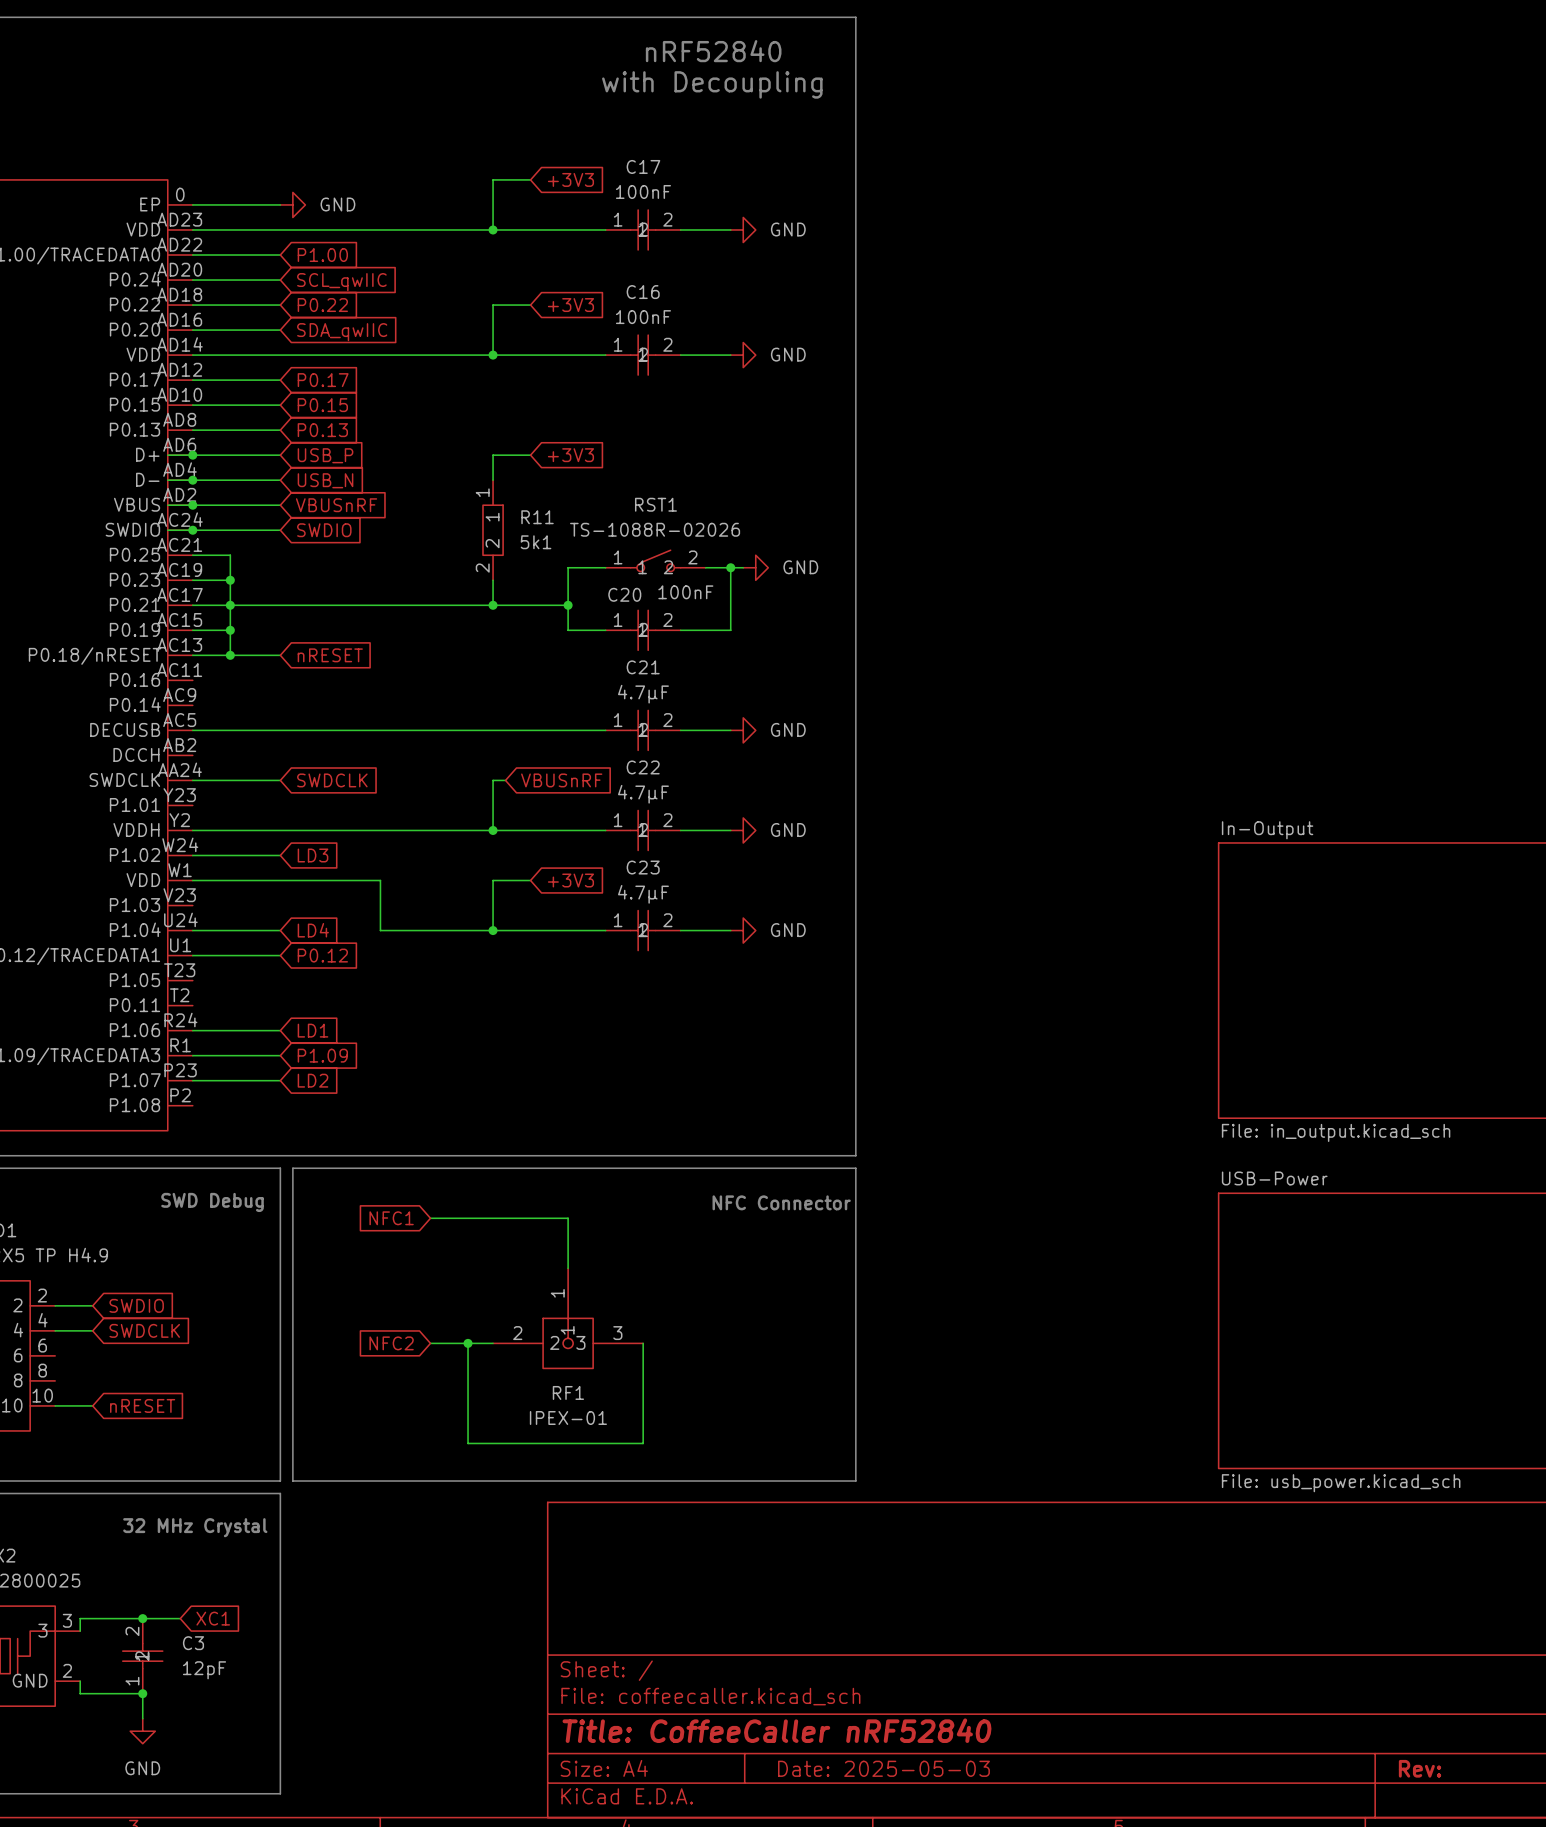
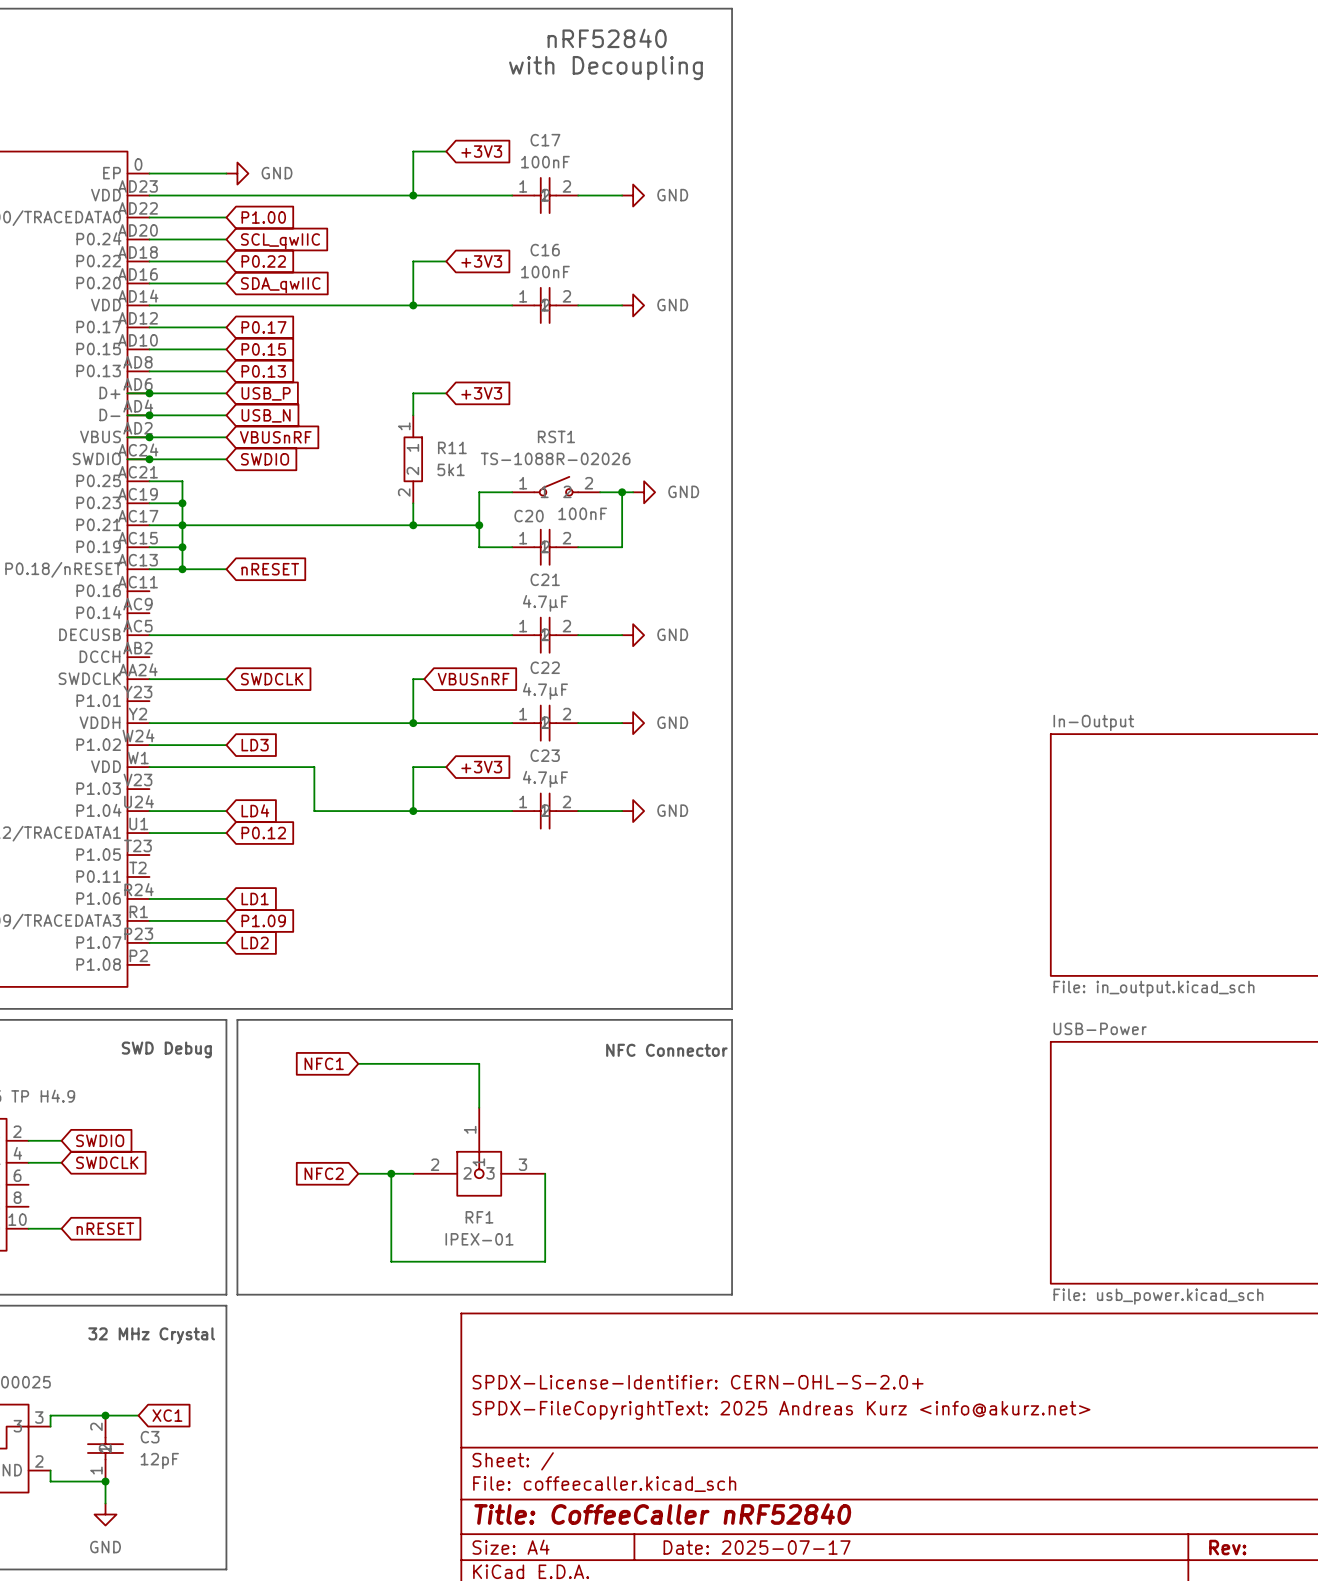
title block: none -> SPDX-License-Identifier: CERN-OHL-S-2.0+ (698, 1382)
title block: none -> SPDX-FileCopyrightText: 2025 Andreas Kurz <info@akurz.net> (781, 1410)
title block: Date: 2025-05-03 (883, 1768) -> Date: 2025-07-17 (757, 1547)

